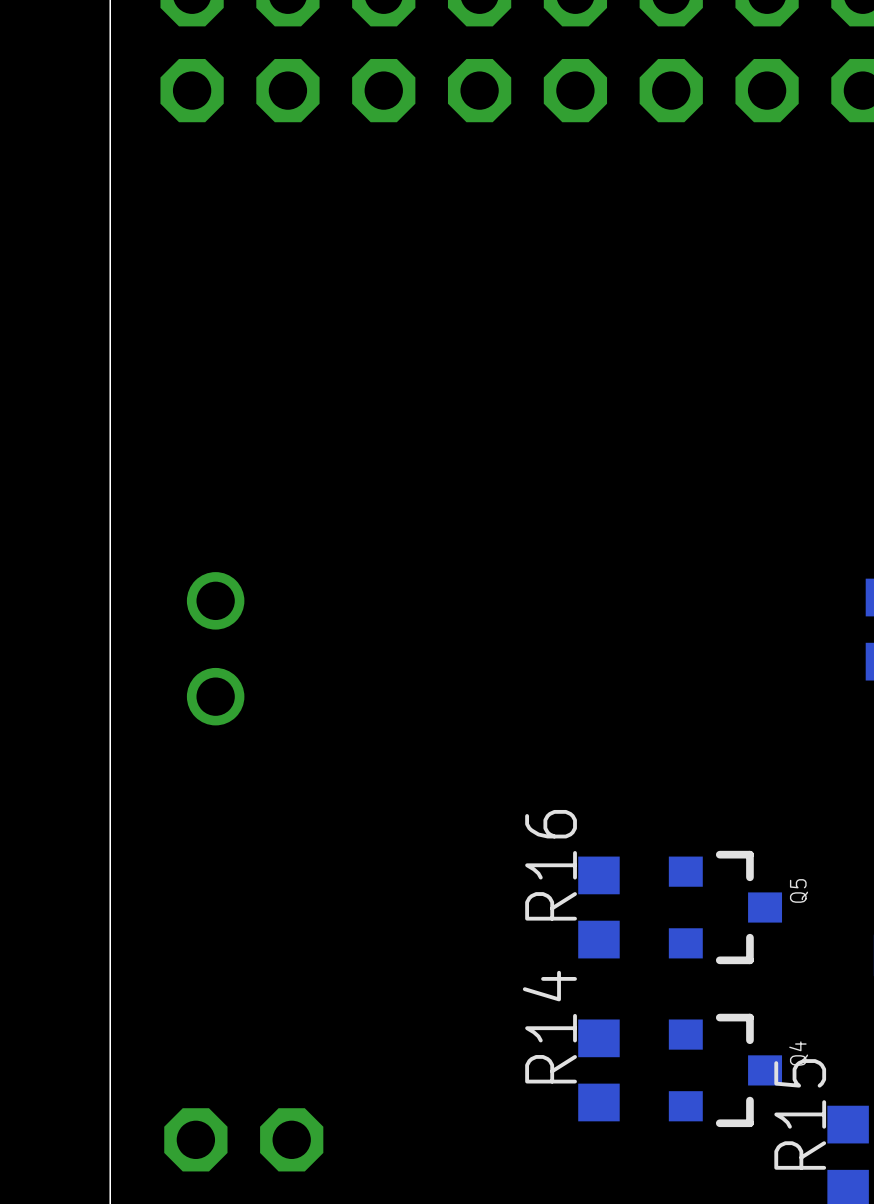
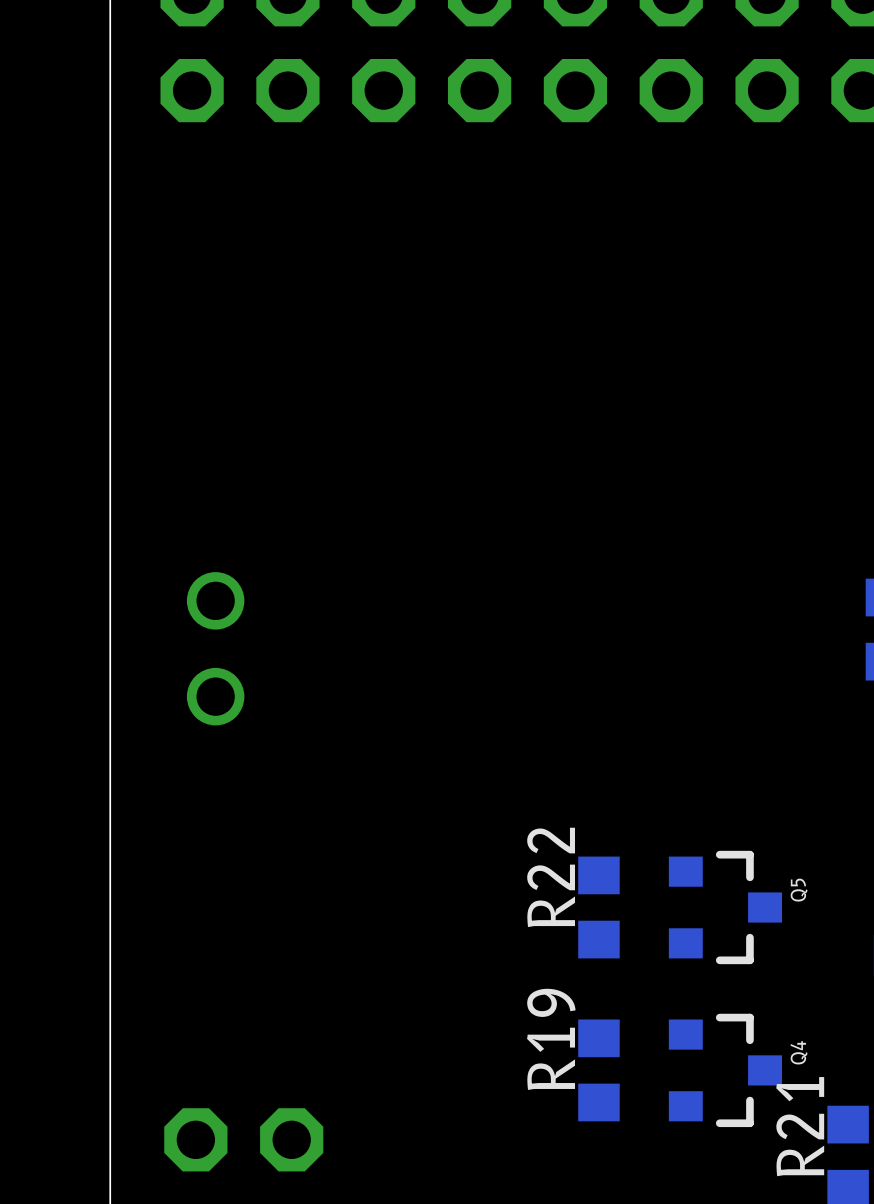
R16 name: R16 (551, 865) -> R22 (551, 877)
R14 name: R14 (549, 1027) -> R19 (551, 1039)
R15 name: R15 (800, 1114) -> R21 (800, 1126)

